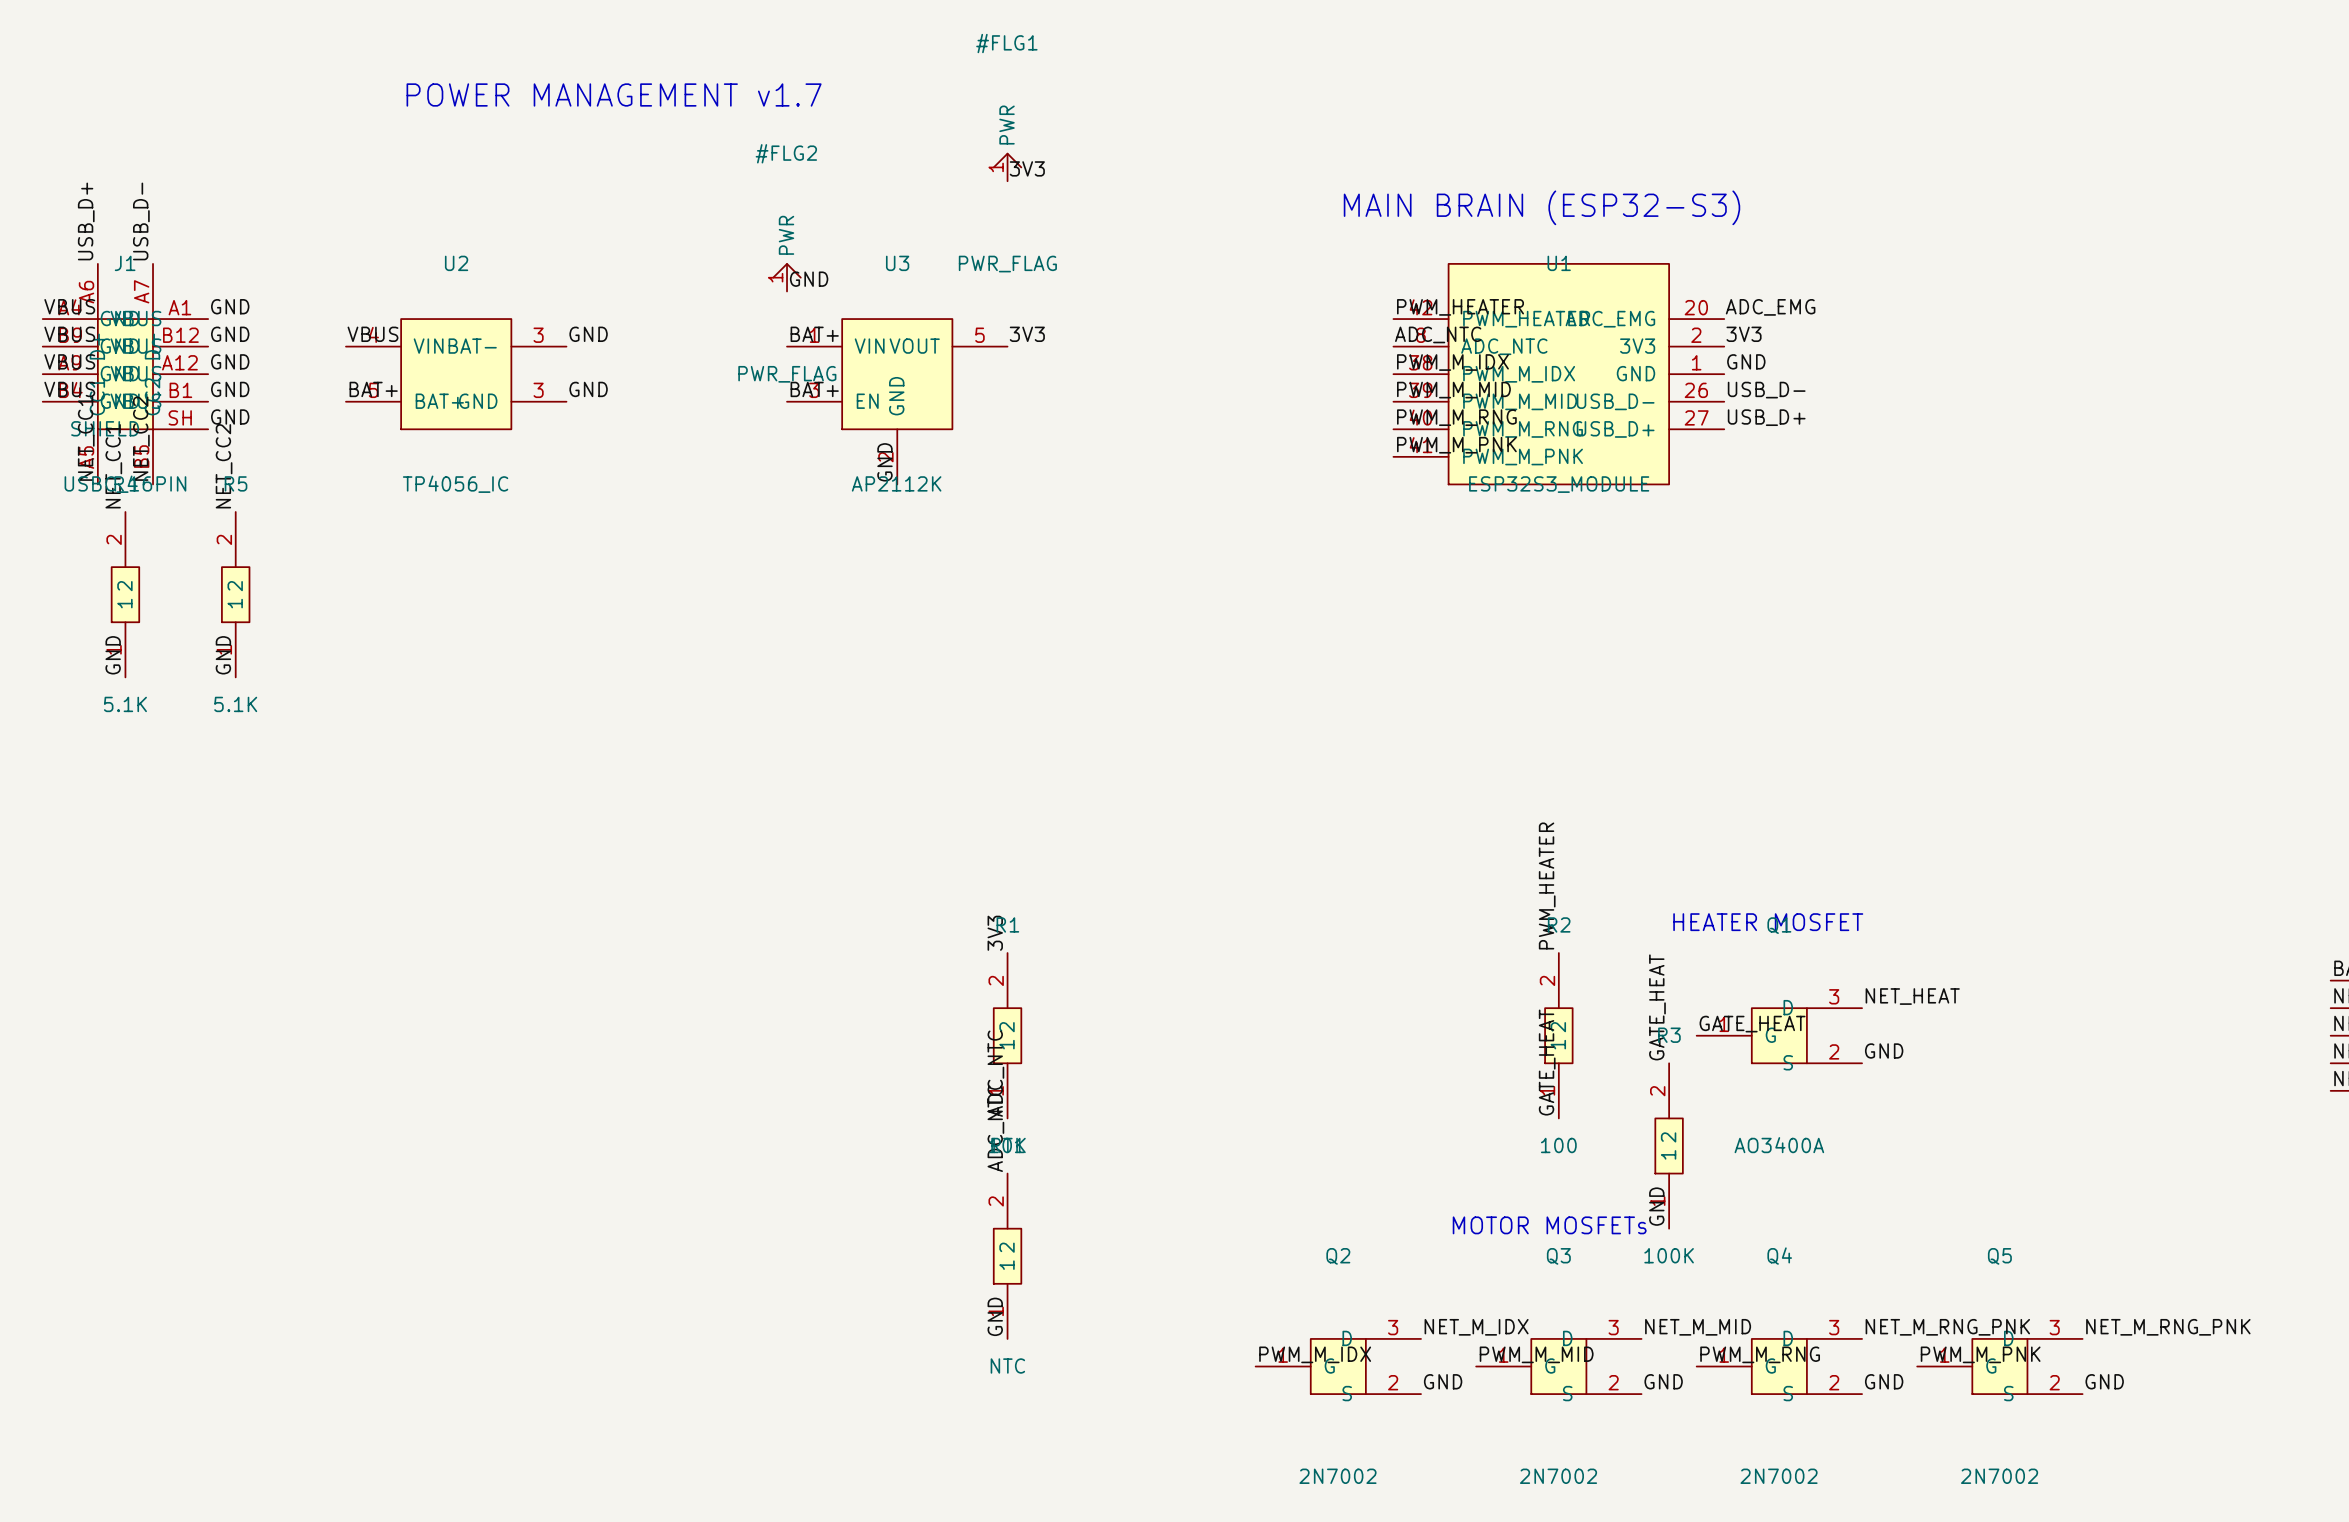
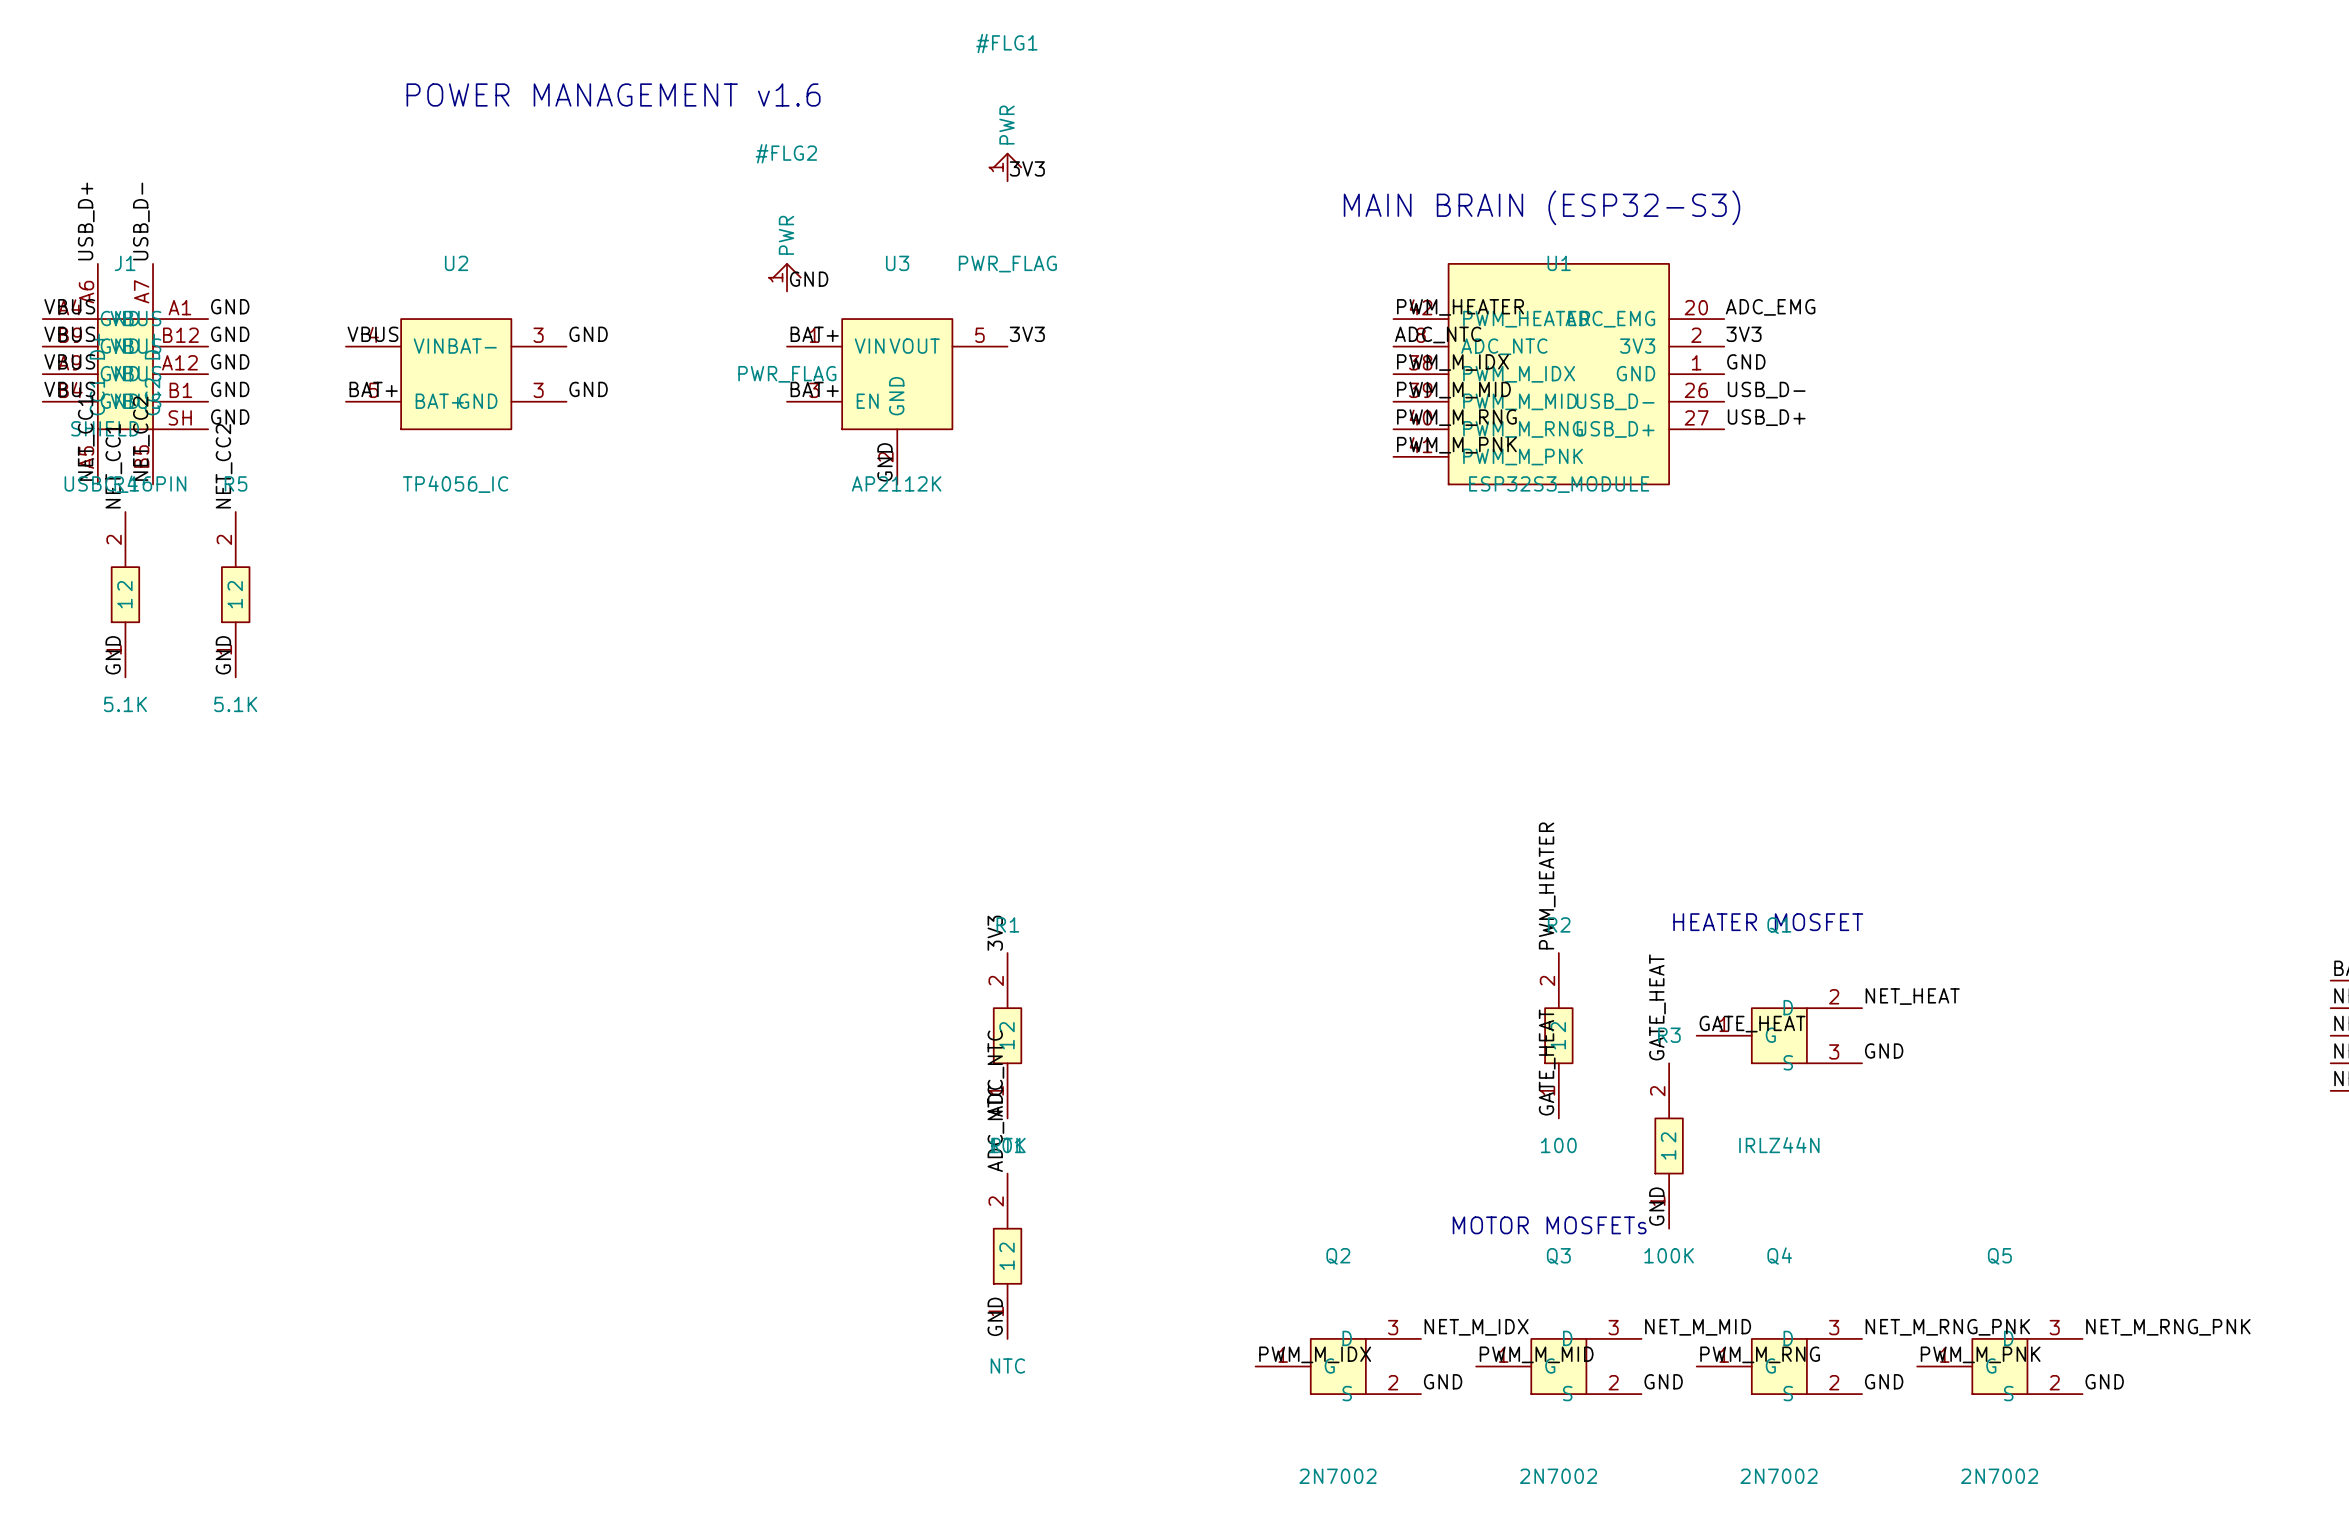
text: POWER MANAGEMENT v1.7 (614, 94) -> POWER MANAGEMENT v1.6 (613, 94)
Q1 pin number: 3 (1834, 996) -> 2 (1834, 996)
Q1 pin number: 2 (1834, 1051) -> 3 (1834, 1051)
Q1 value: AO3400A (1779, 1145) -> IRLZ44N (1779, 1145)

